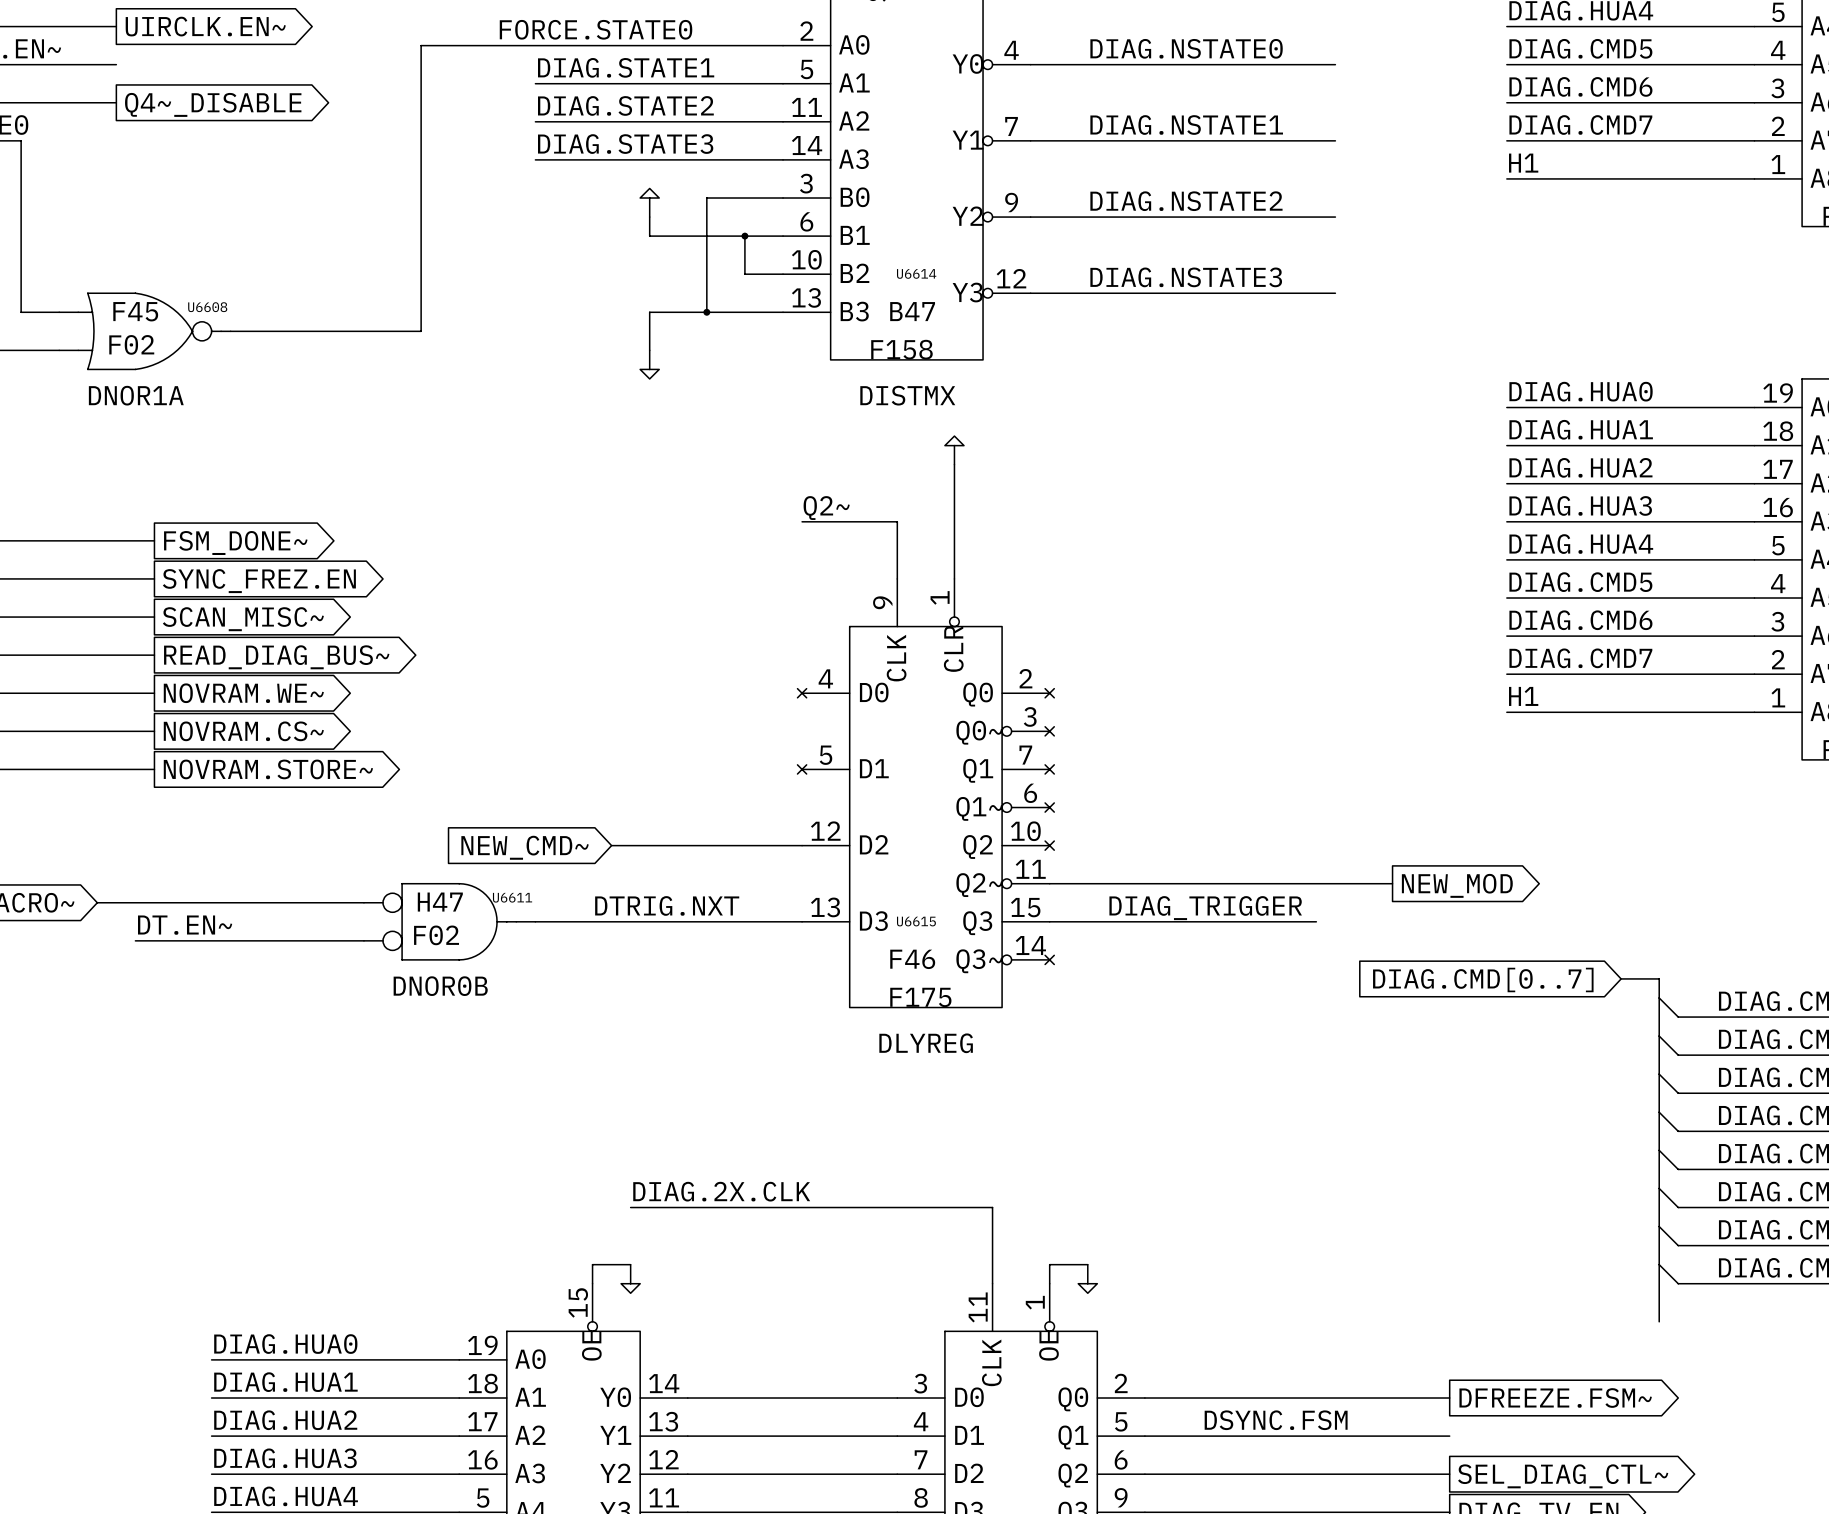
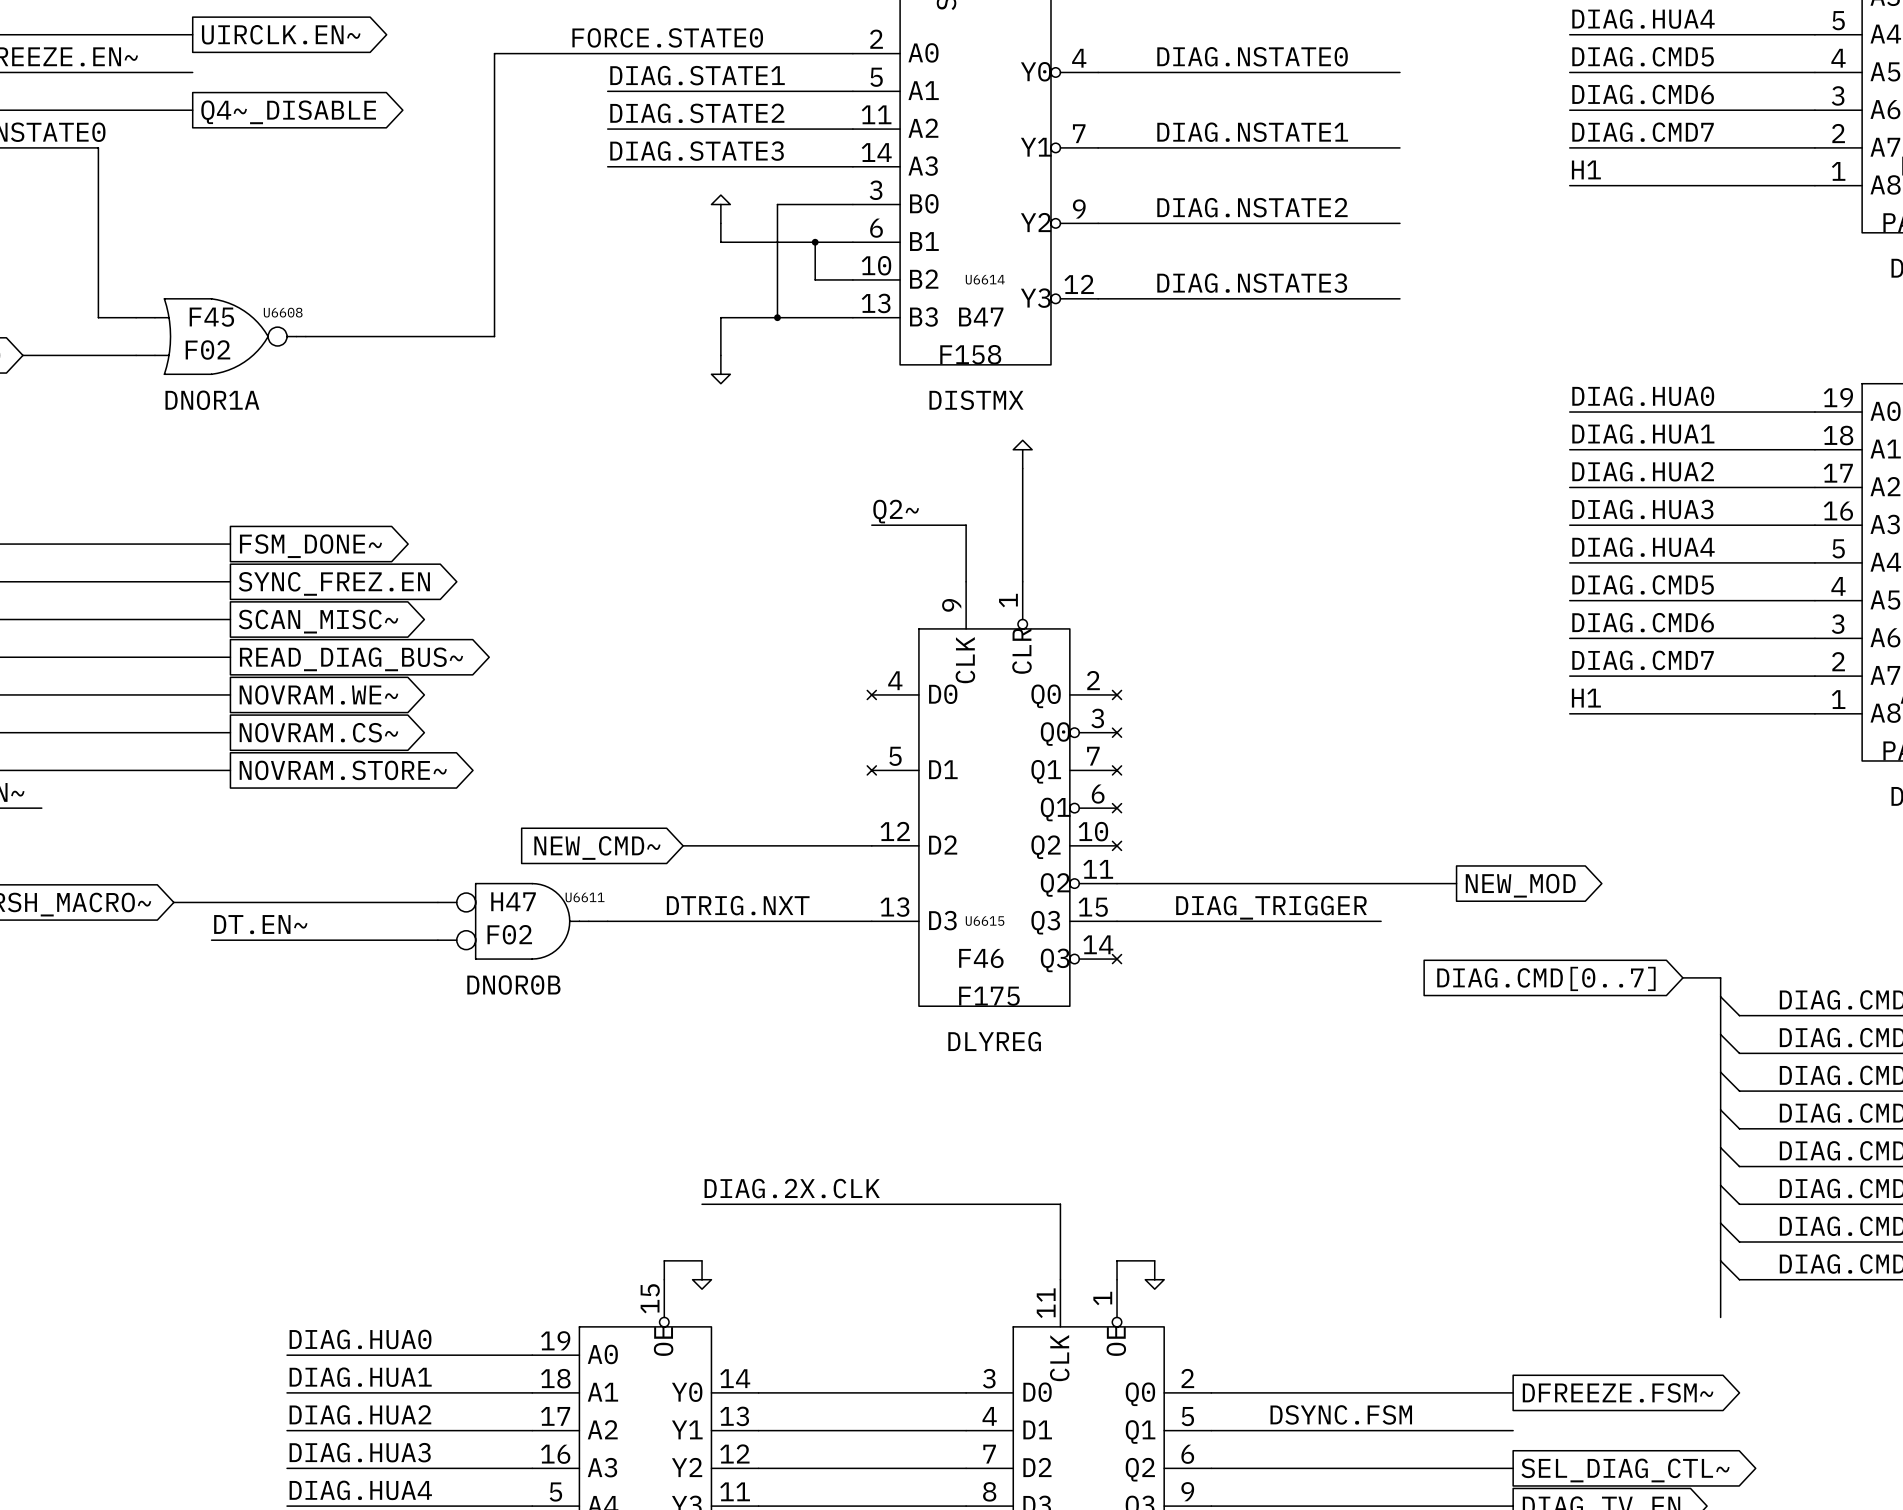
U6615 pin name: Q0~ (979, 732) -> Q0 (1055, 734)
U6615 pin name: Q1~ (979, 808) -> Q1 (1055, 809)
U6615 pin name: Q2~ (979, 885) -> Q2 (1055, 884)
U6615 pin name: Q3~ (979, 961) -> Q3 (1055, 960)

